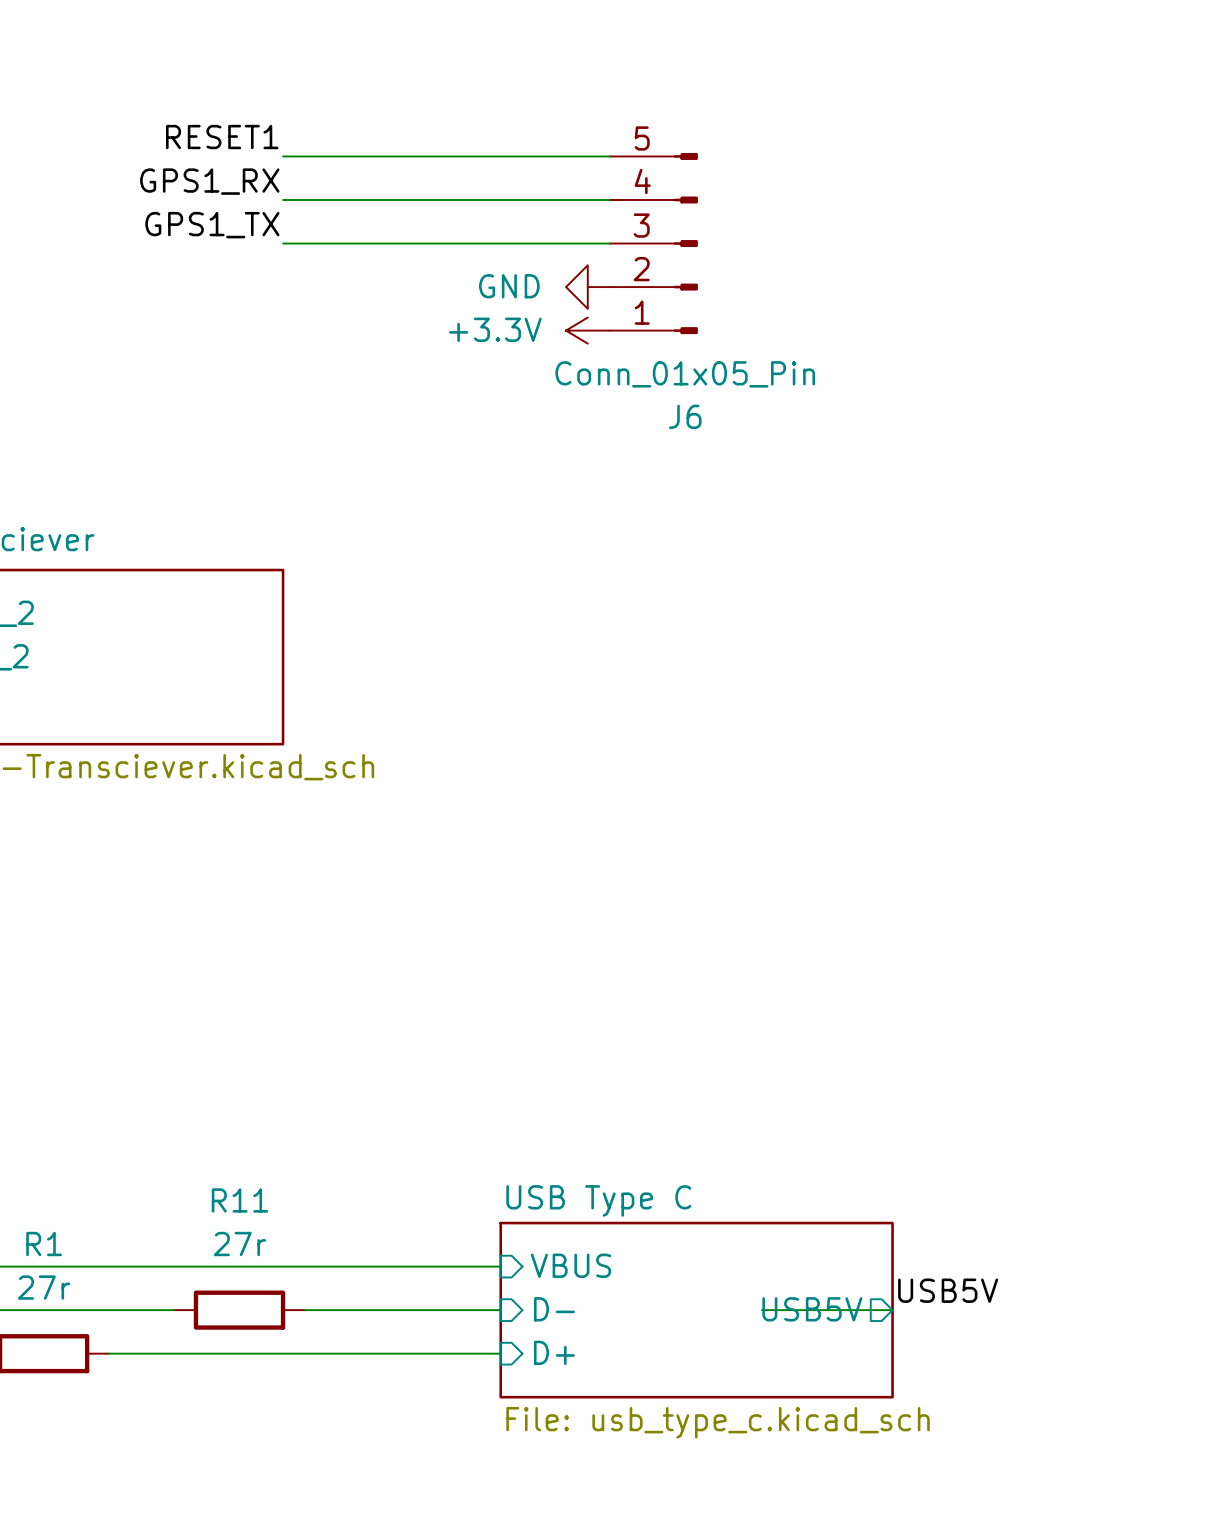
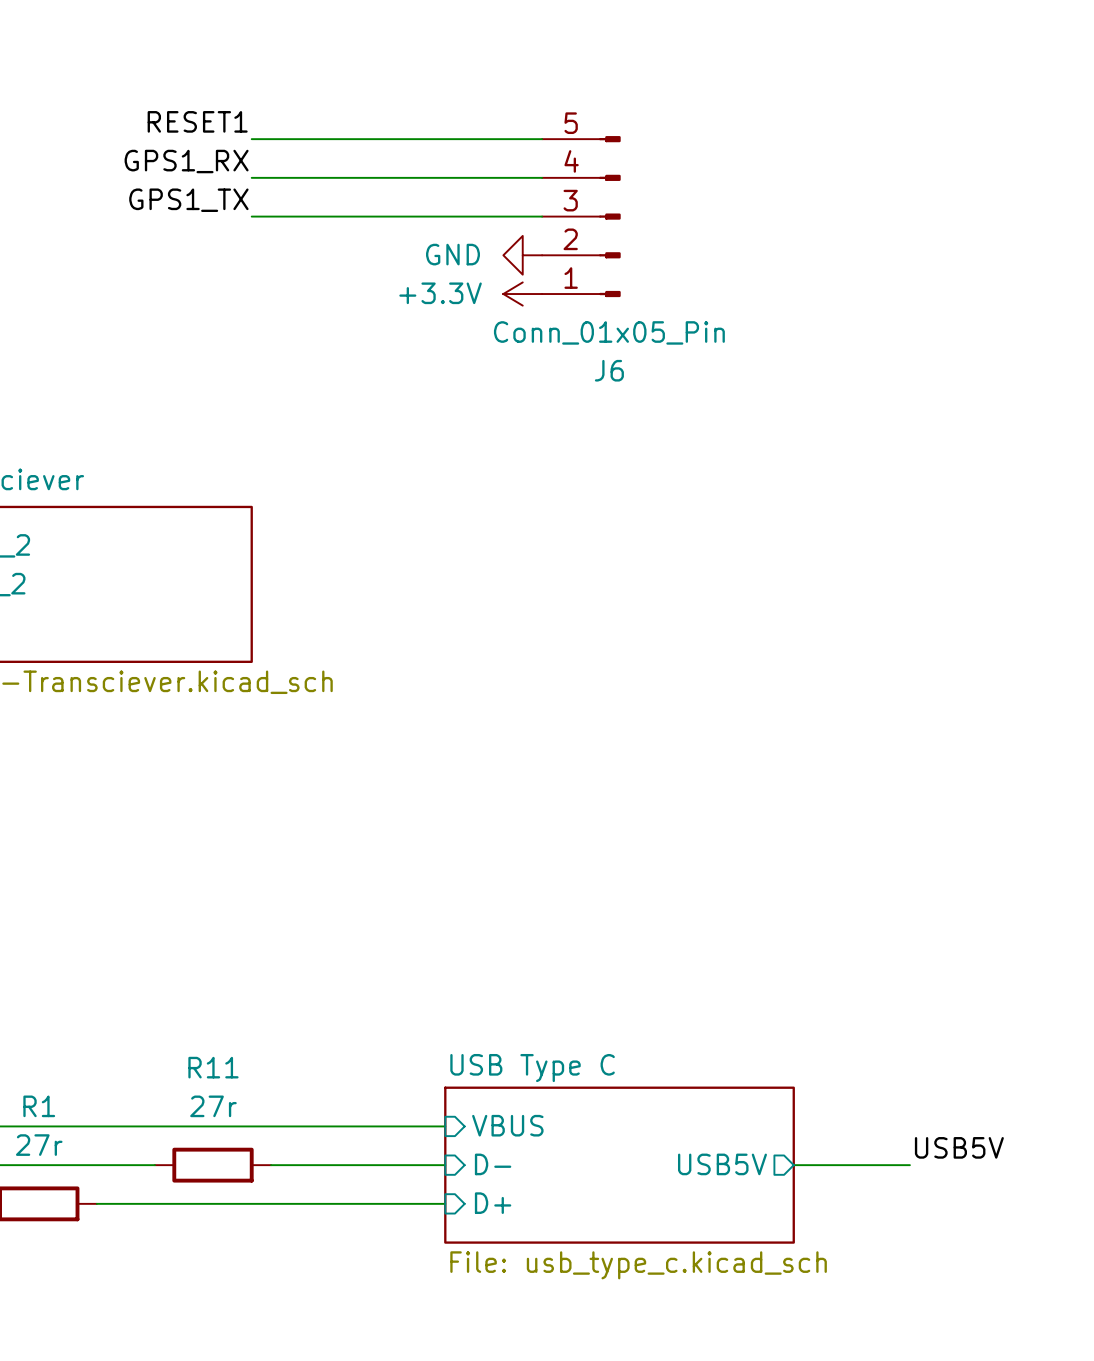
label position: USB5V (948, 1290) -> USB5V (959, 1147)
wire: (761, 1310) (892, 1310) -> (909, 1165) (793, 1165)

